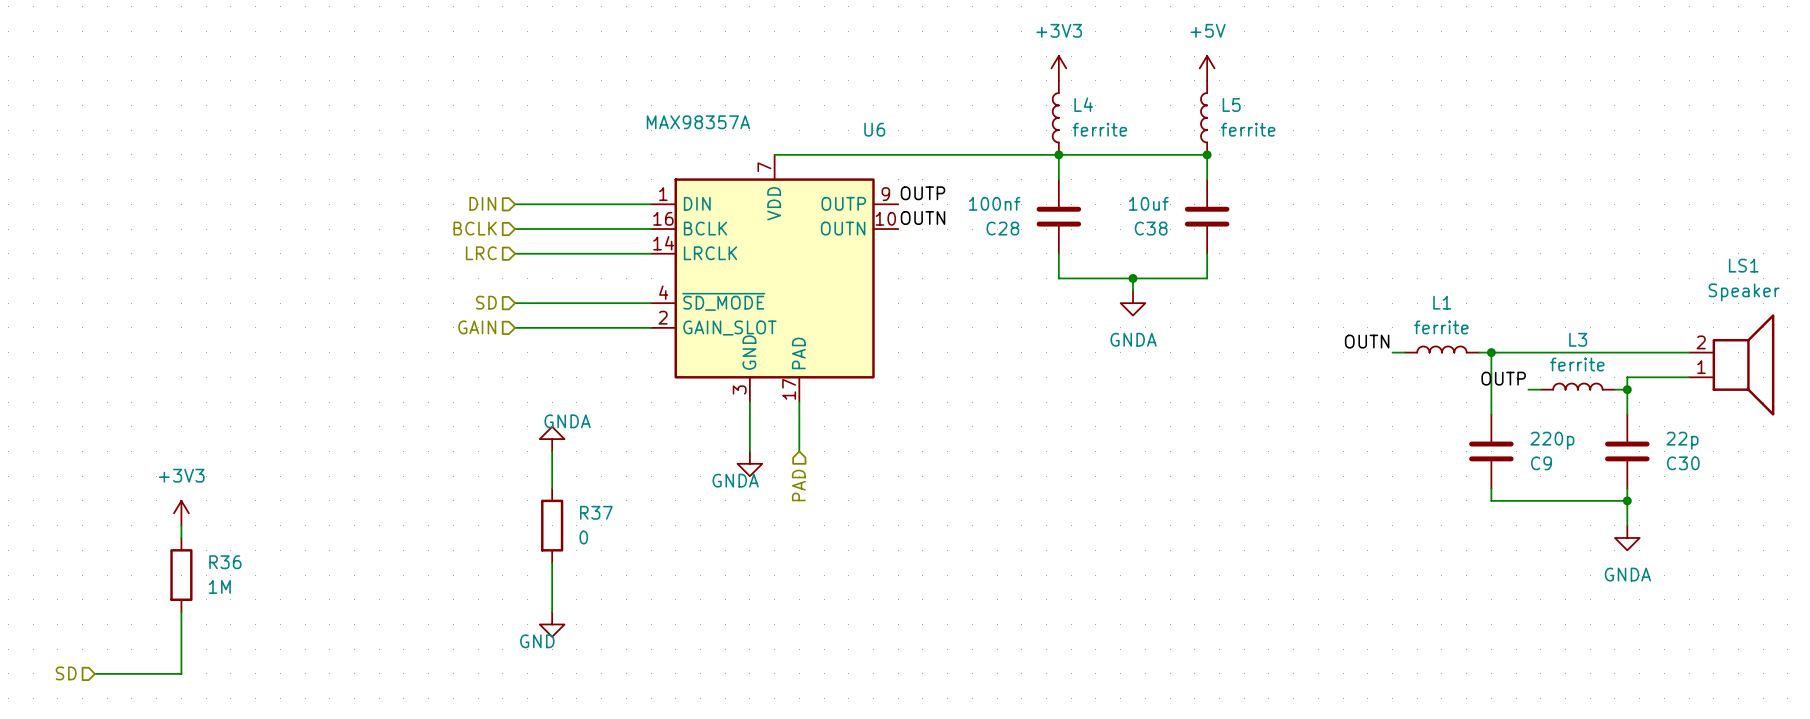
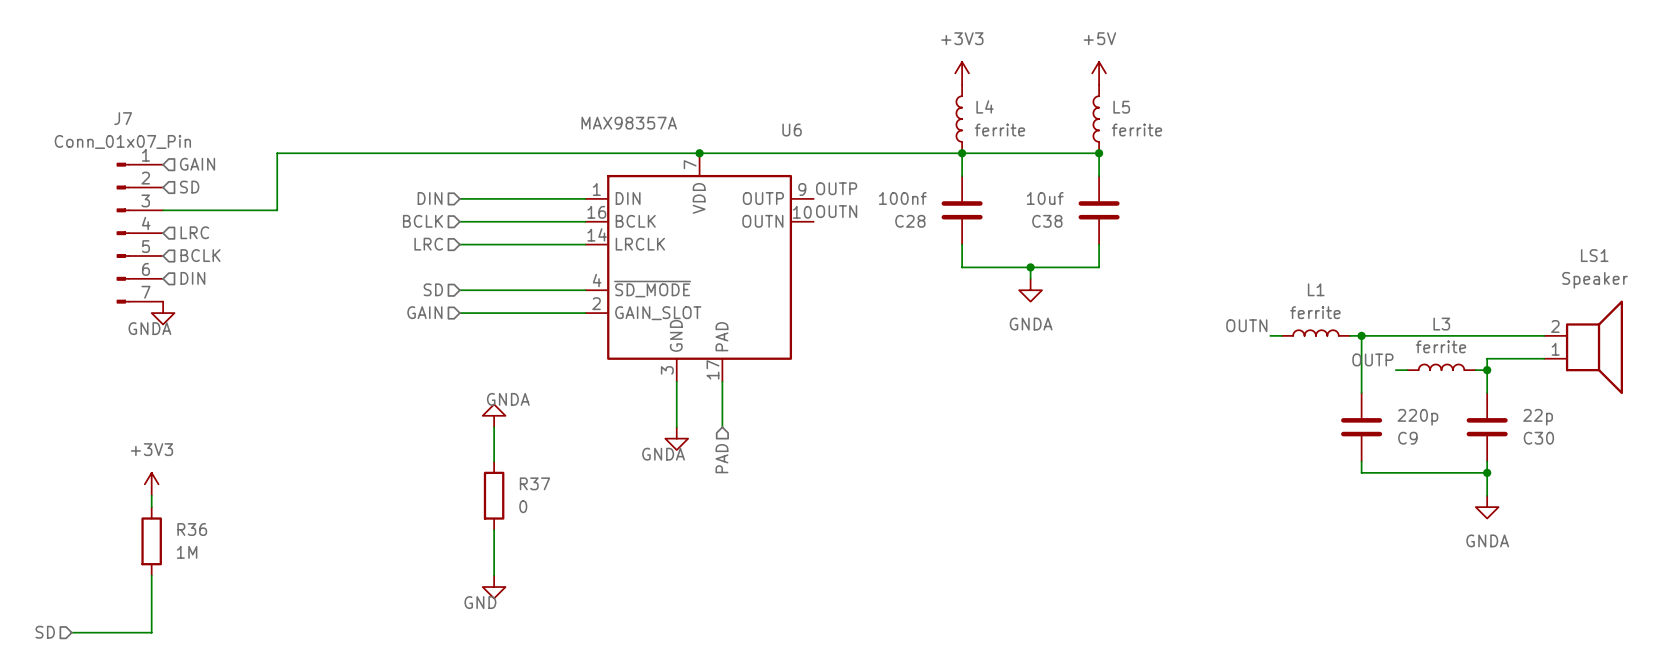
wire: none -> (699, 153) (277, 153) (277, 210) (163, 210)
junction: none -> (699, 153)
hierarchical label: none -> GAIN (197, 164)
hierarchical label: none -> SD (189, 187)
hierarchical label: none -> LRC (194, 232)
J7: none -> Conn_01x07_Pin (139, 233)
hierarchical label: none -> BCLK (200, 255)
hierarchical label: none -> DIN (192, 278)
power symbol: none -> GNDA (163, 313)

